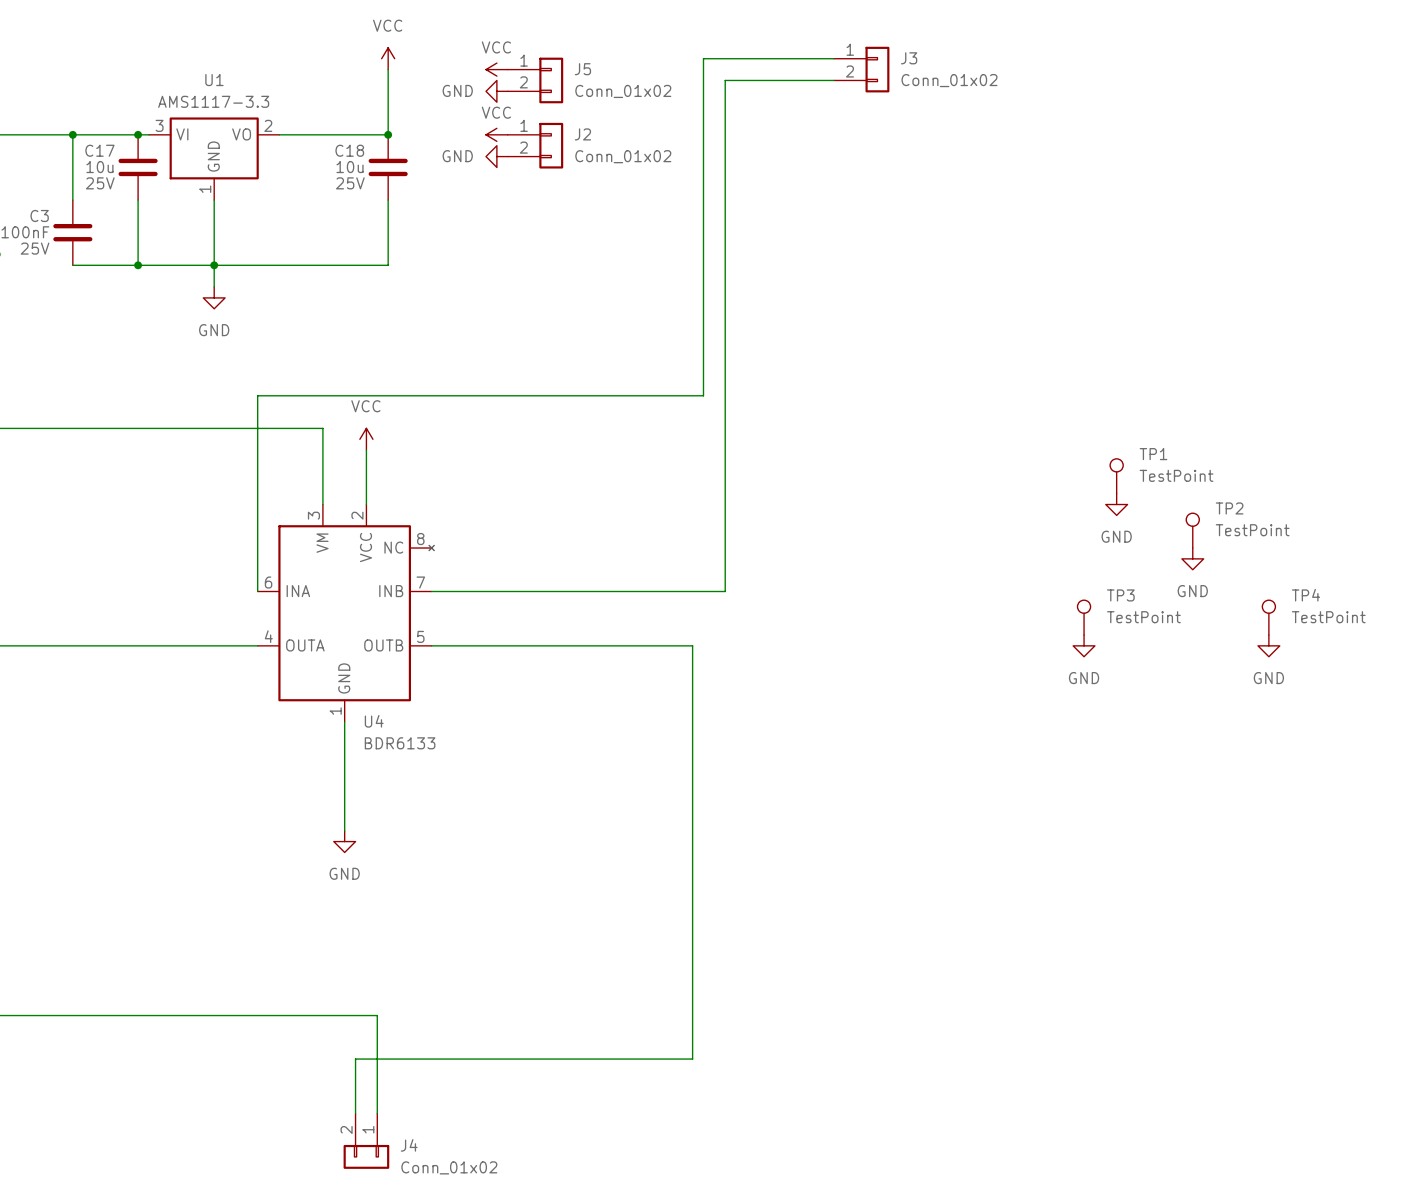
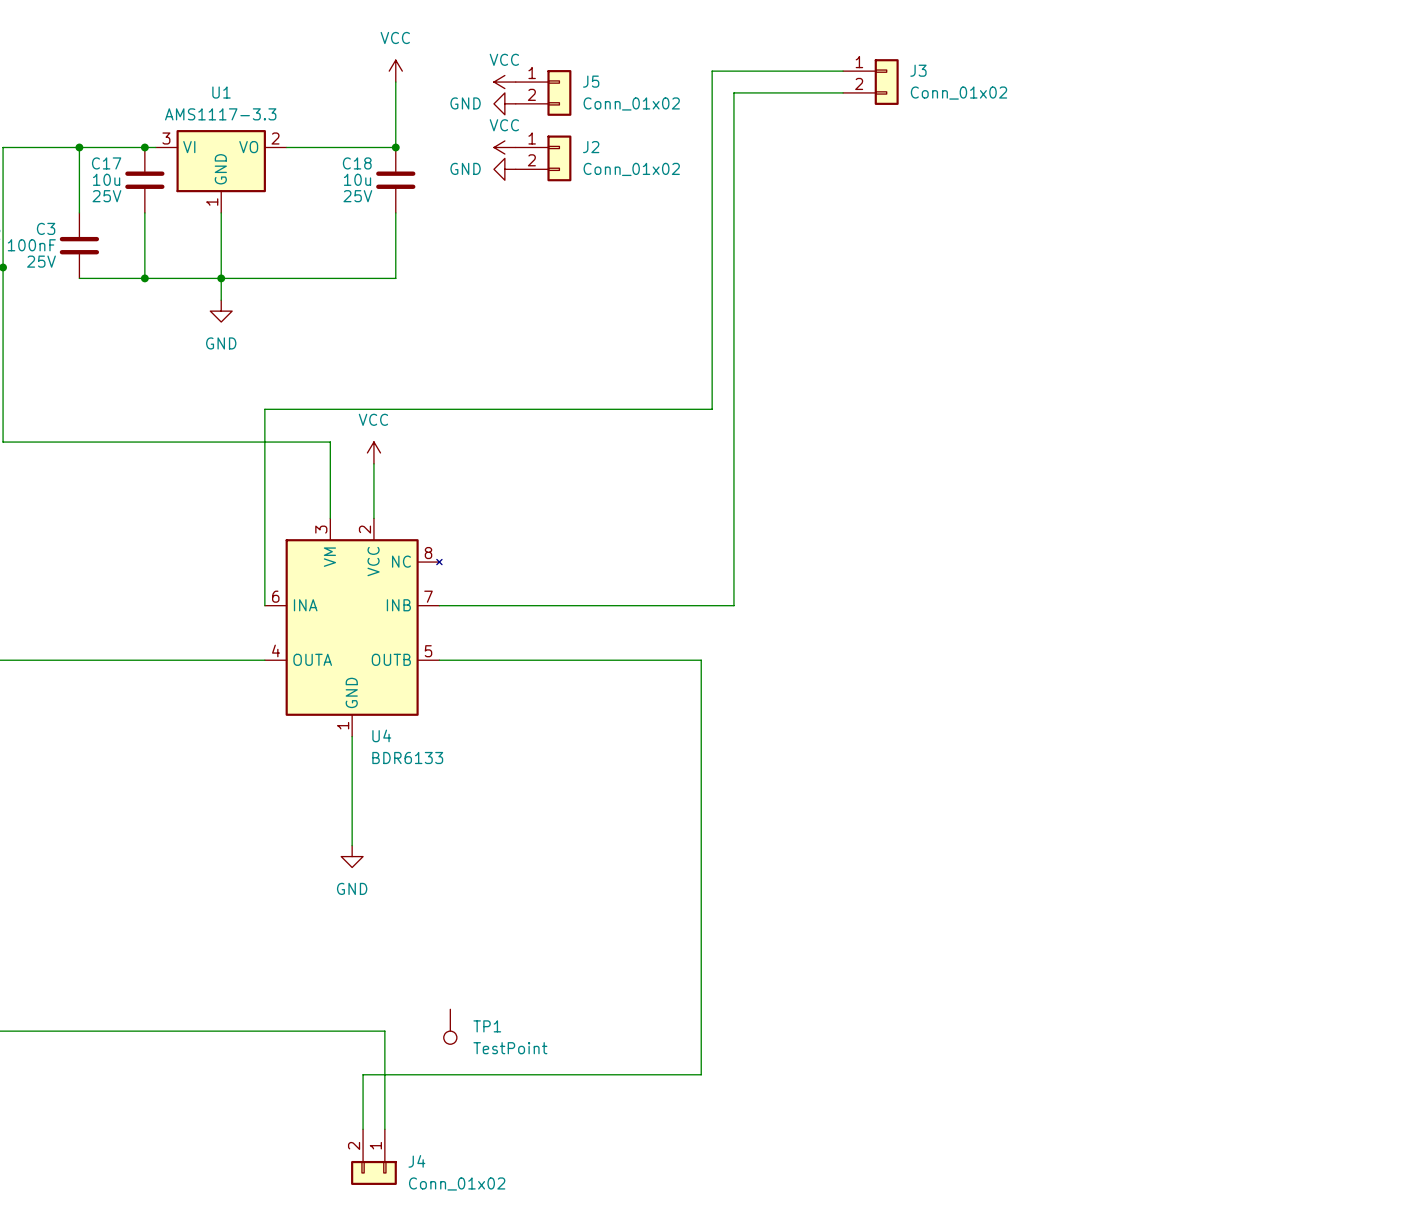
TP1 name position: TP1 (1153, 454) -> TP1 (487, 1026)
TP1 rotation: 0° (1116, 465) -> 180° (450, 1037)
TP1 value position: TestPoint (1176, 475) -> TestPoint (510, 1048)
TP1 position: (1116, 476) -> (450, 1026)
power symbol: GND (1116, 504) -> none
TP2: TestPoint (1192, 530) -> none
power symbol: GND (1192, 558) -> none
TP3: TestPoint (1084, 617) -> none
TP4: TestPoint (1268, 617) -> none
power symbol: GND (1084, 645) -> none
power symbol: GND (1268, 645) -> none

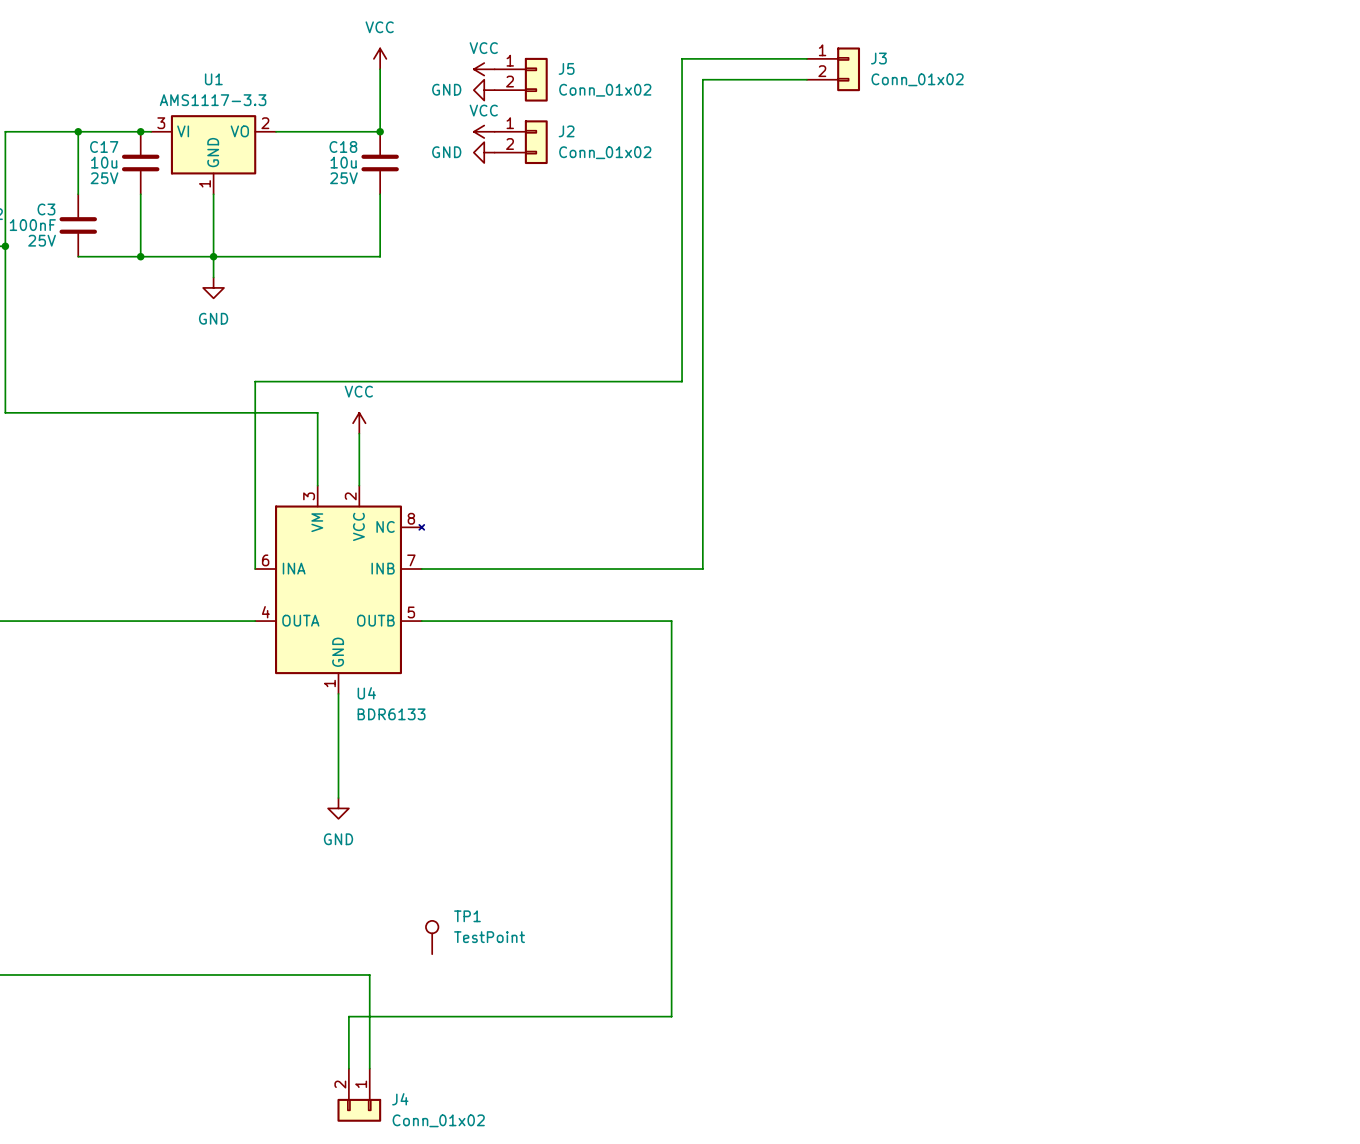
TP1 position: (450, 1026) -> (432, 937)
TP1 name position: TP1 (487, 1026) -> TP1 (467, 916)
TP1 rotation: 0° (450, 1037) -> 180° (432, 927)
TP1 value position: TestPoint (510, 1048) -> TestPoint (489, 937)

